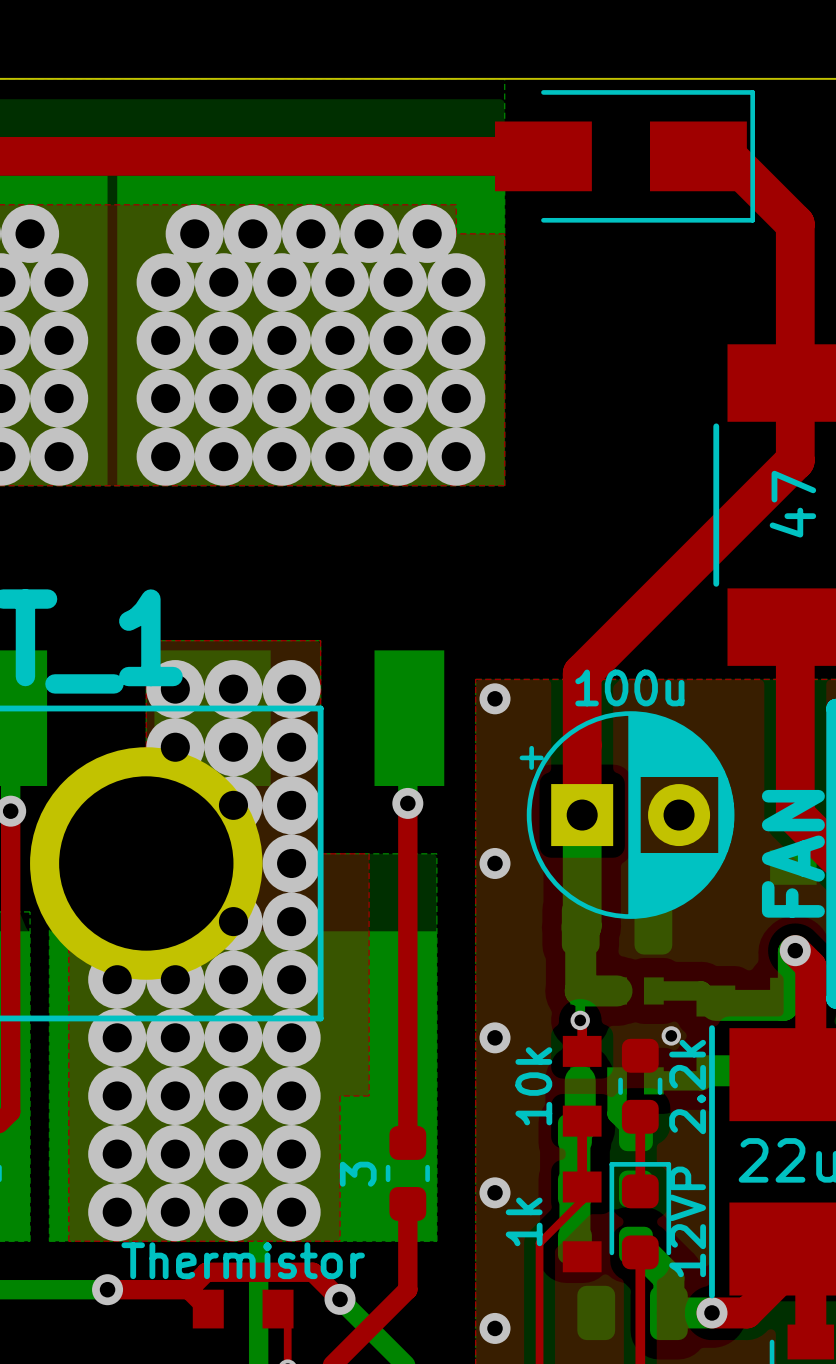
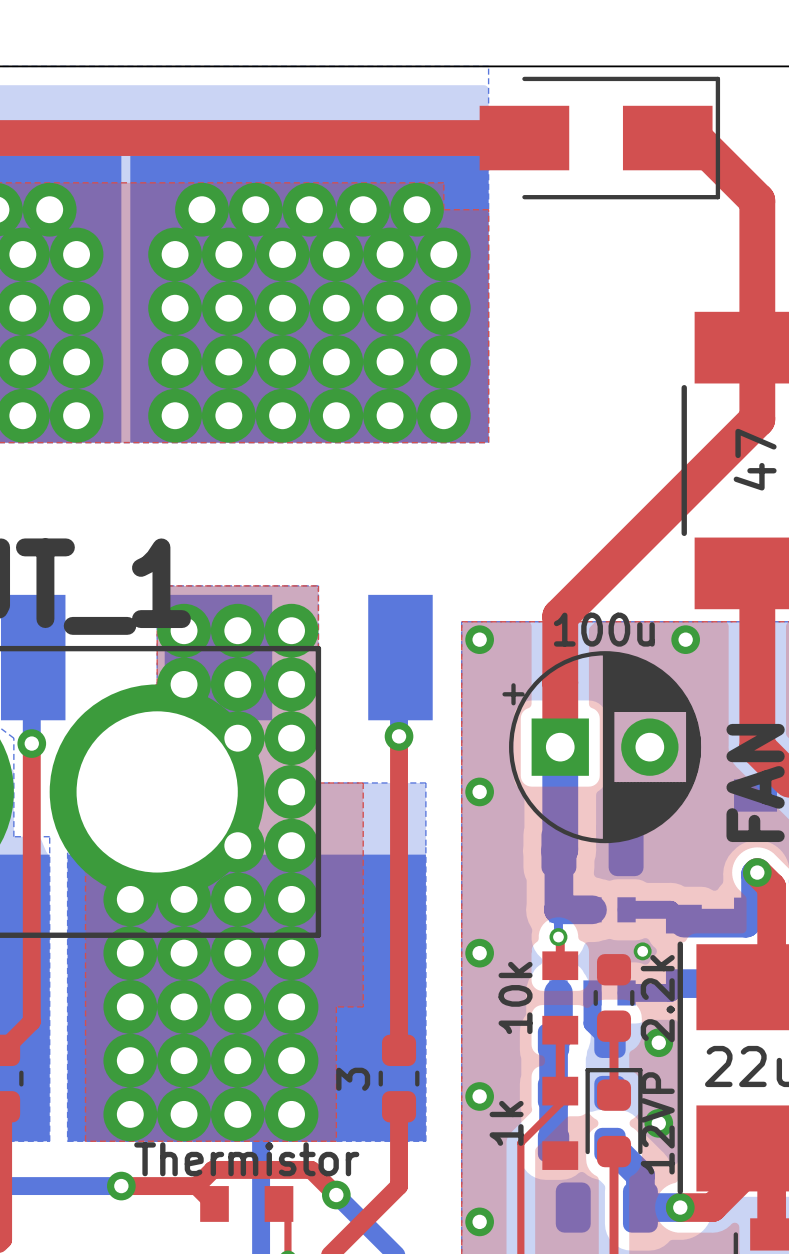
via: none -> (685, 639)
via: none -> (658, 1042)
via: none -> (658, 1123)

